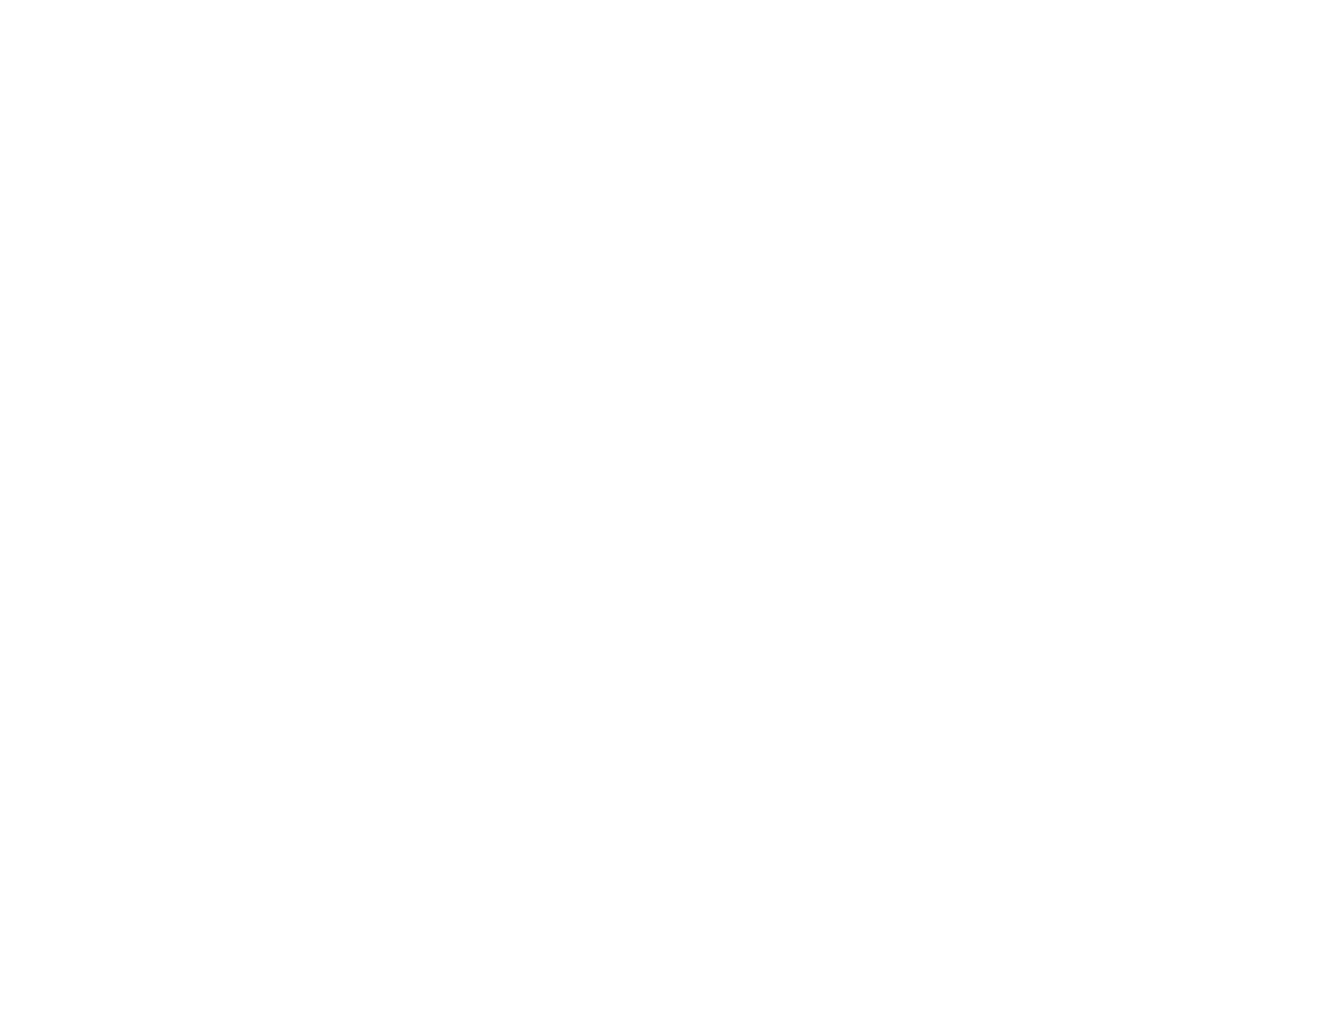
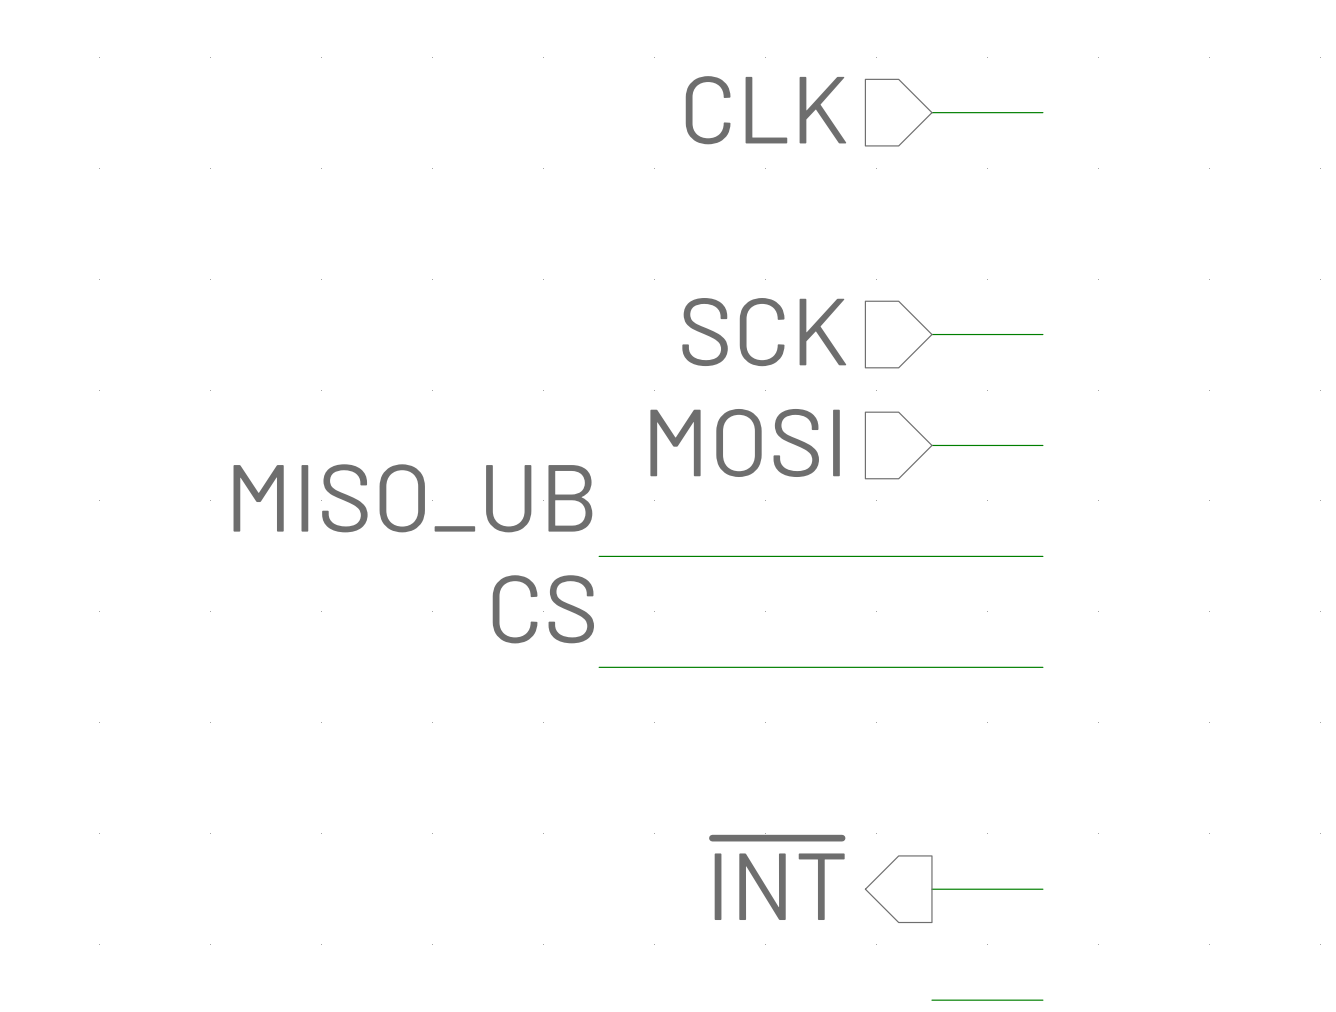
hierarchical label: none -> CLK (765, 110)
wire: none -> (931, 112) (1042, 112)
hierarchical label: none -> SCK (764, 332)
wire: none -> (931, 334) (1042, 334)
hierarchical label: none -> MOSI (745, 442)
wire: none -> (931, 445) (1042, 445)
label: none -> MISO_UB (412, 498)
wire: none -> (599, 556) (1042, 556)
label: none -> CS (543, 609)
wire: none -> (599, 667) (1042, 667)
hierarchical label: none -> ~{INT} (778, 879)
wire: none -> (931, 889) (1042, 889)
wire: none -> (931, 1000) (1042, 1000)

